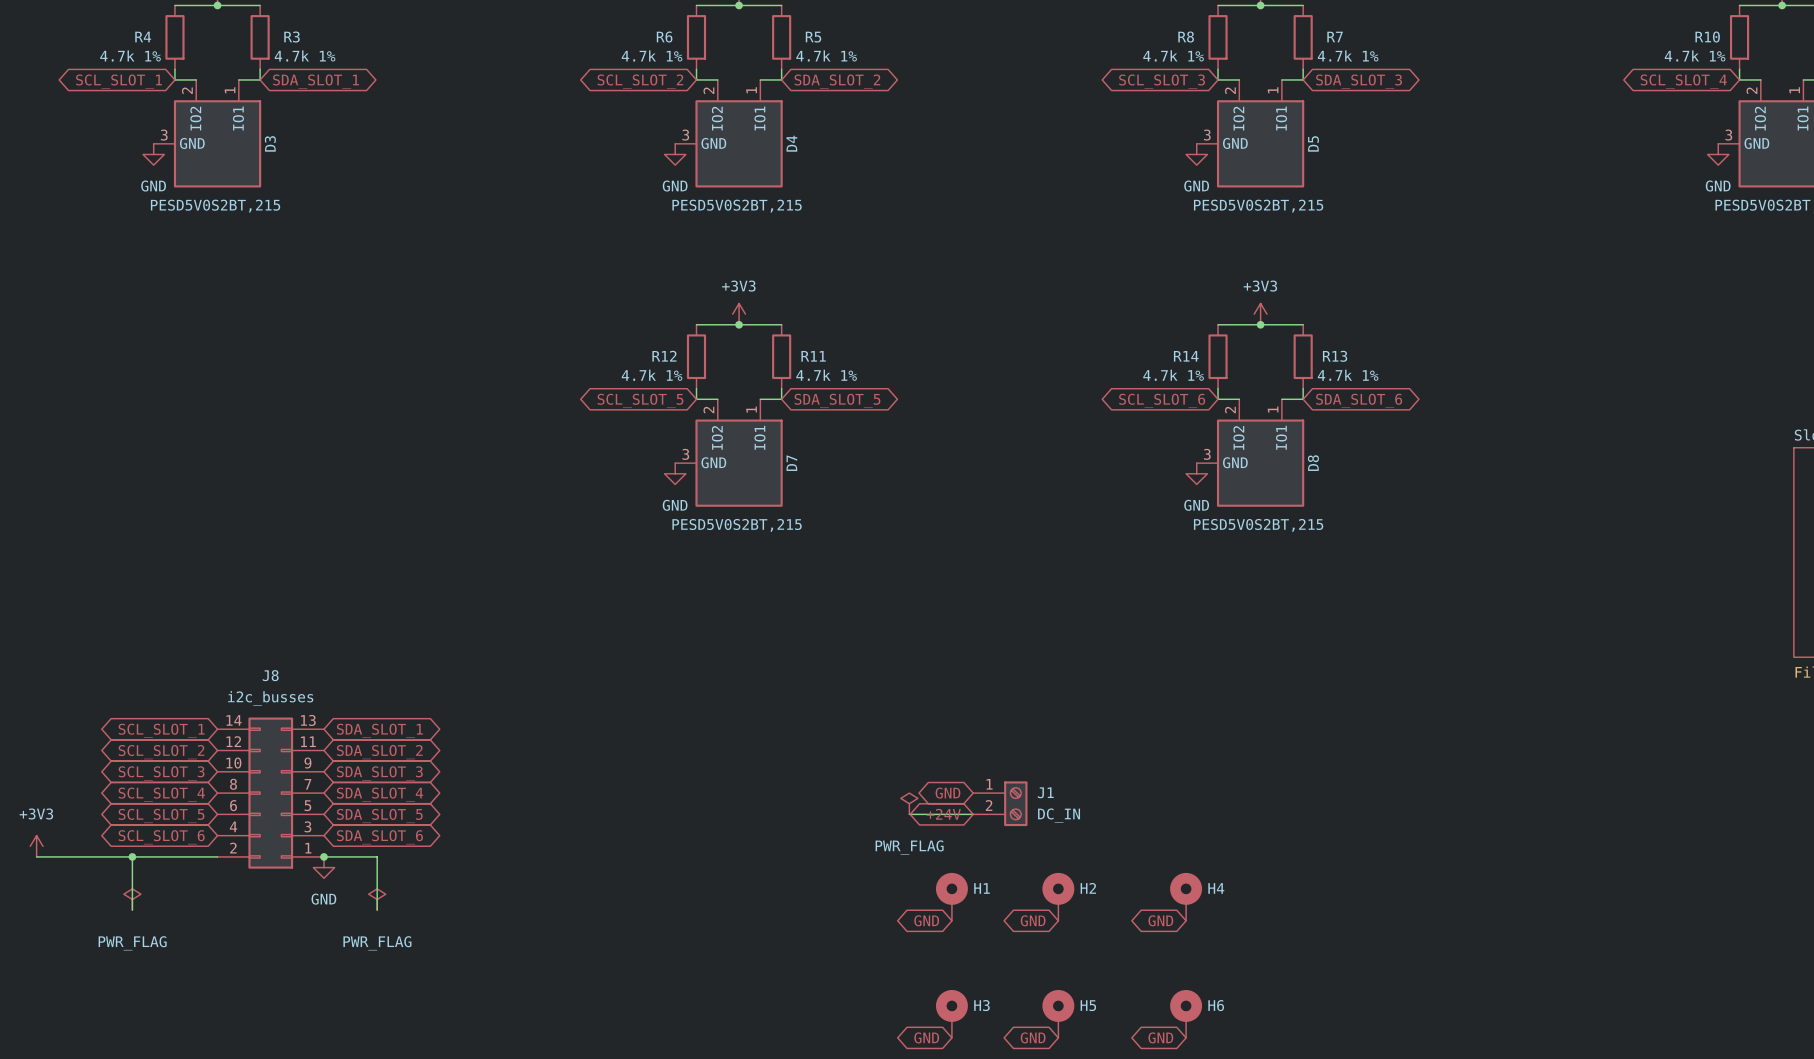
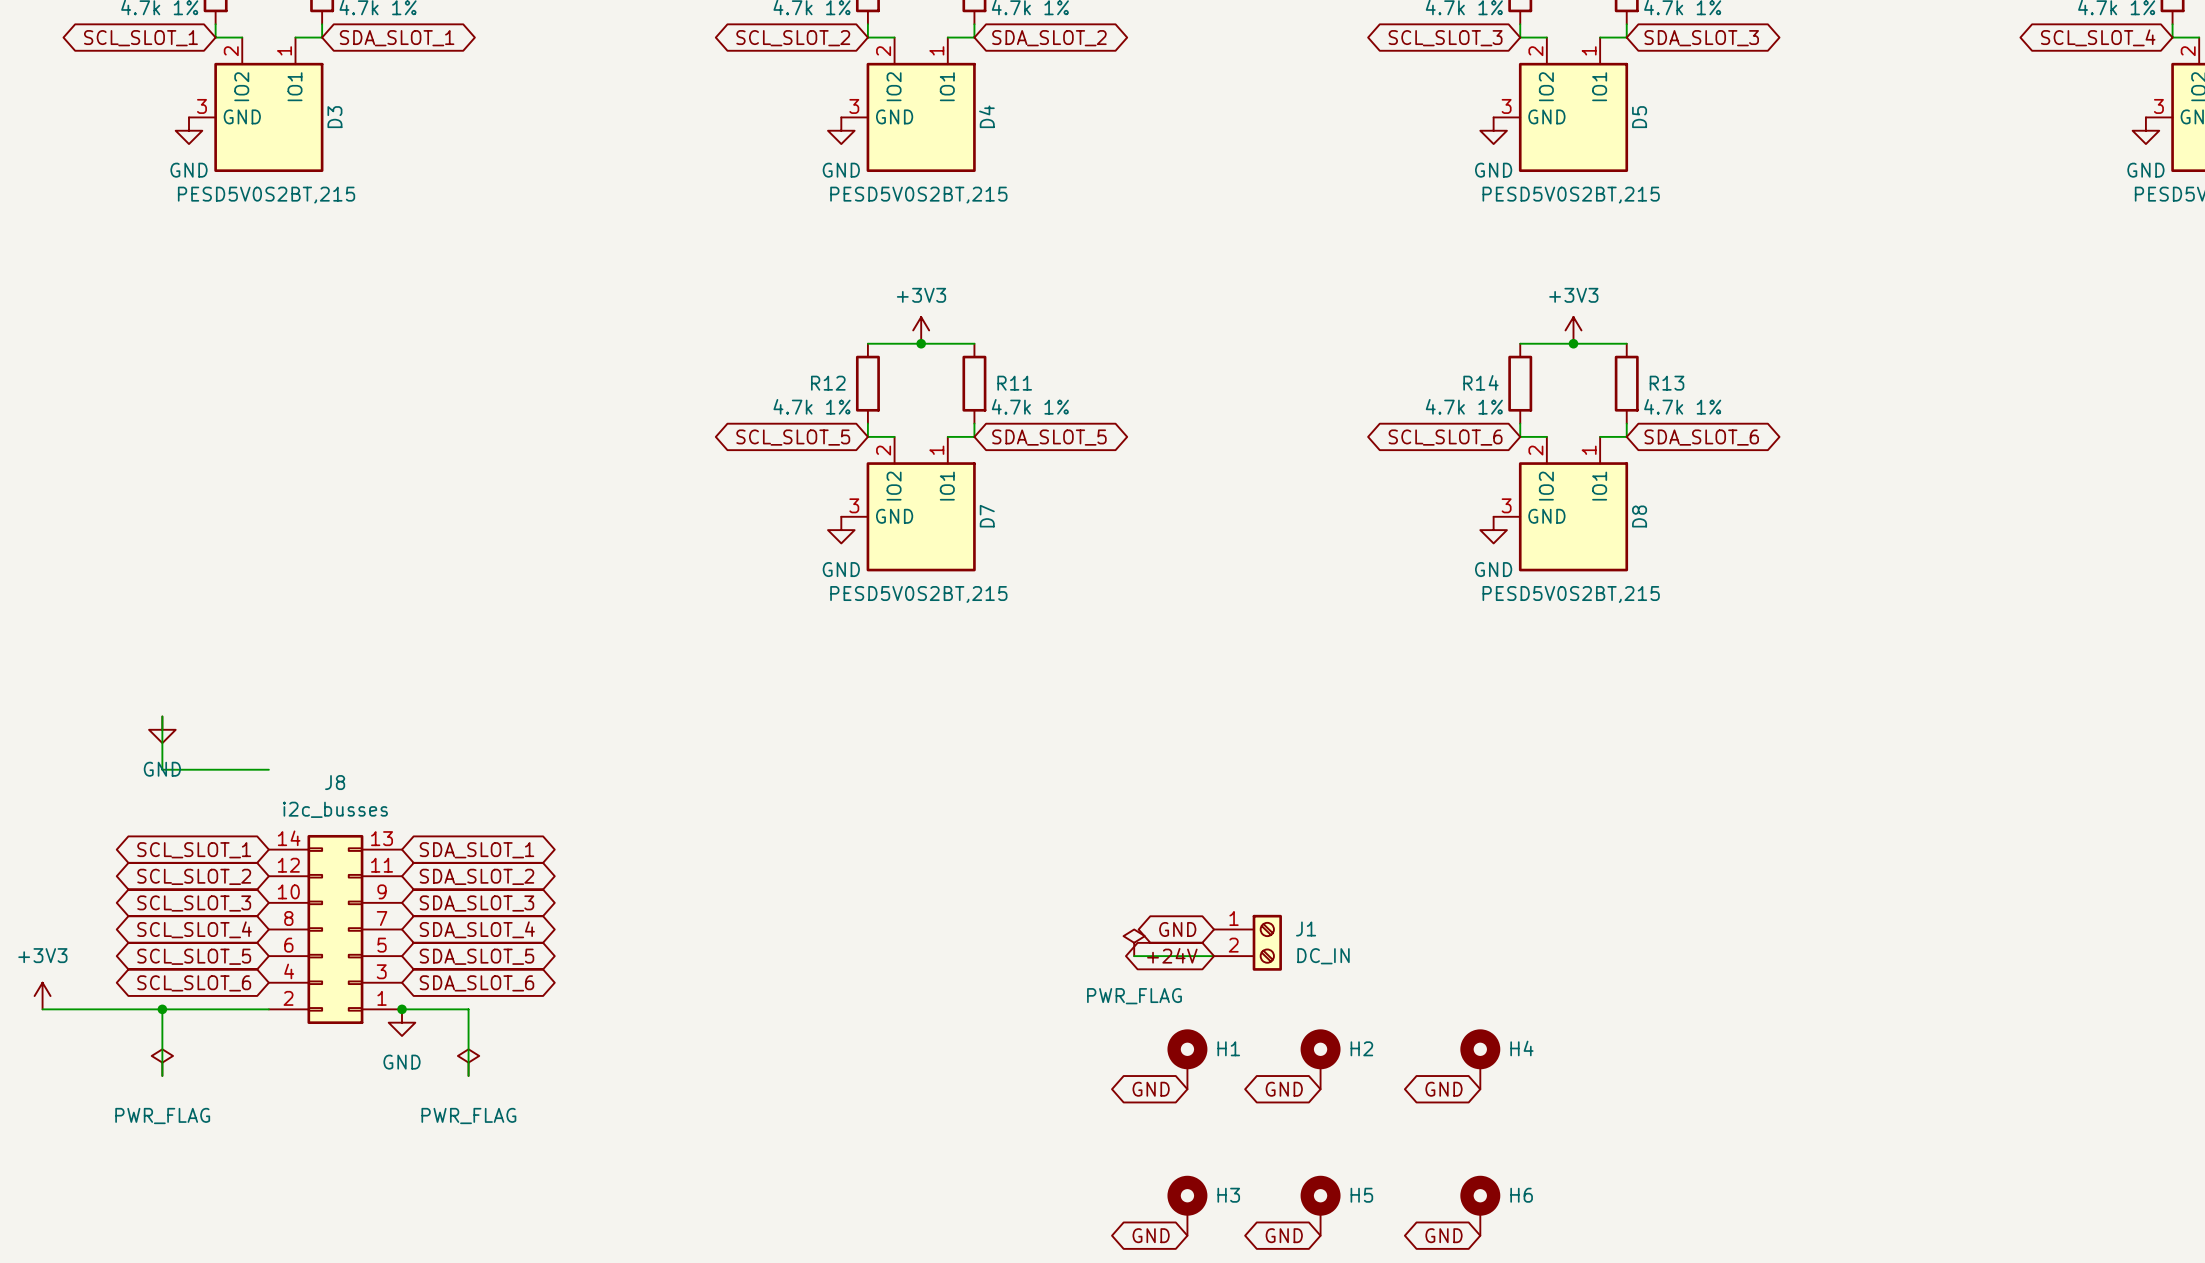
wire: none -> (162, 716) (162, 769) (268, 769)
power symbol: none -> GND (162, 729)

